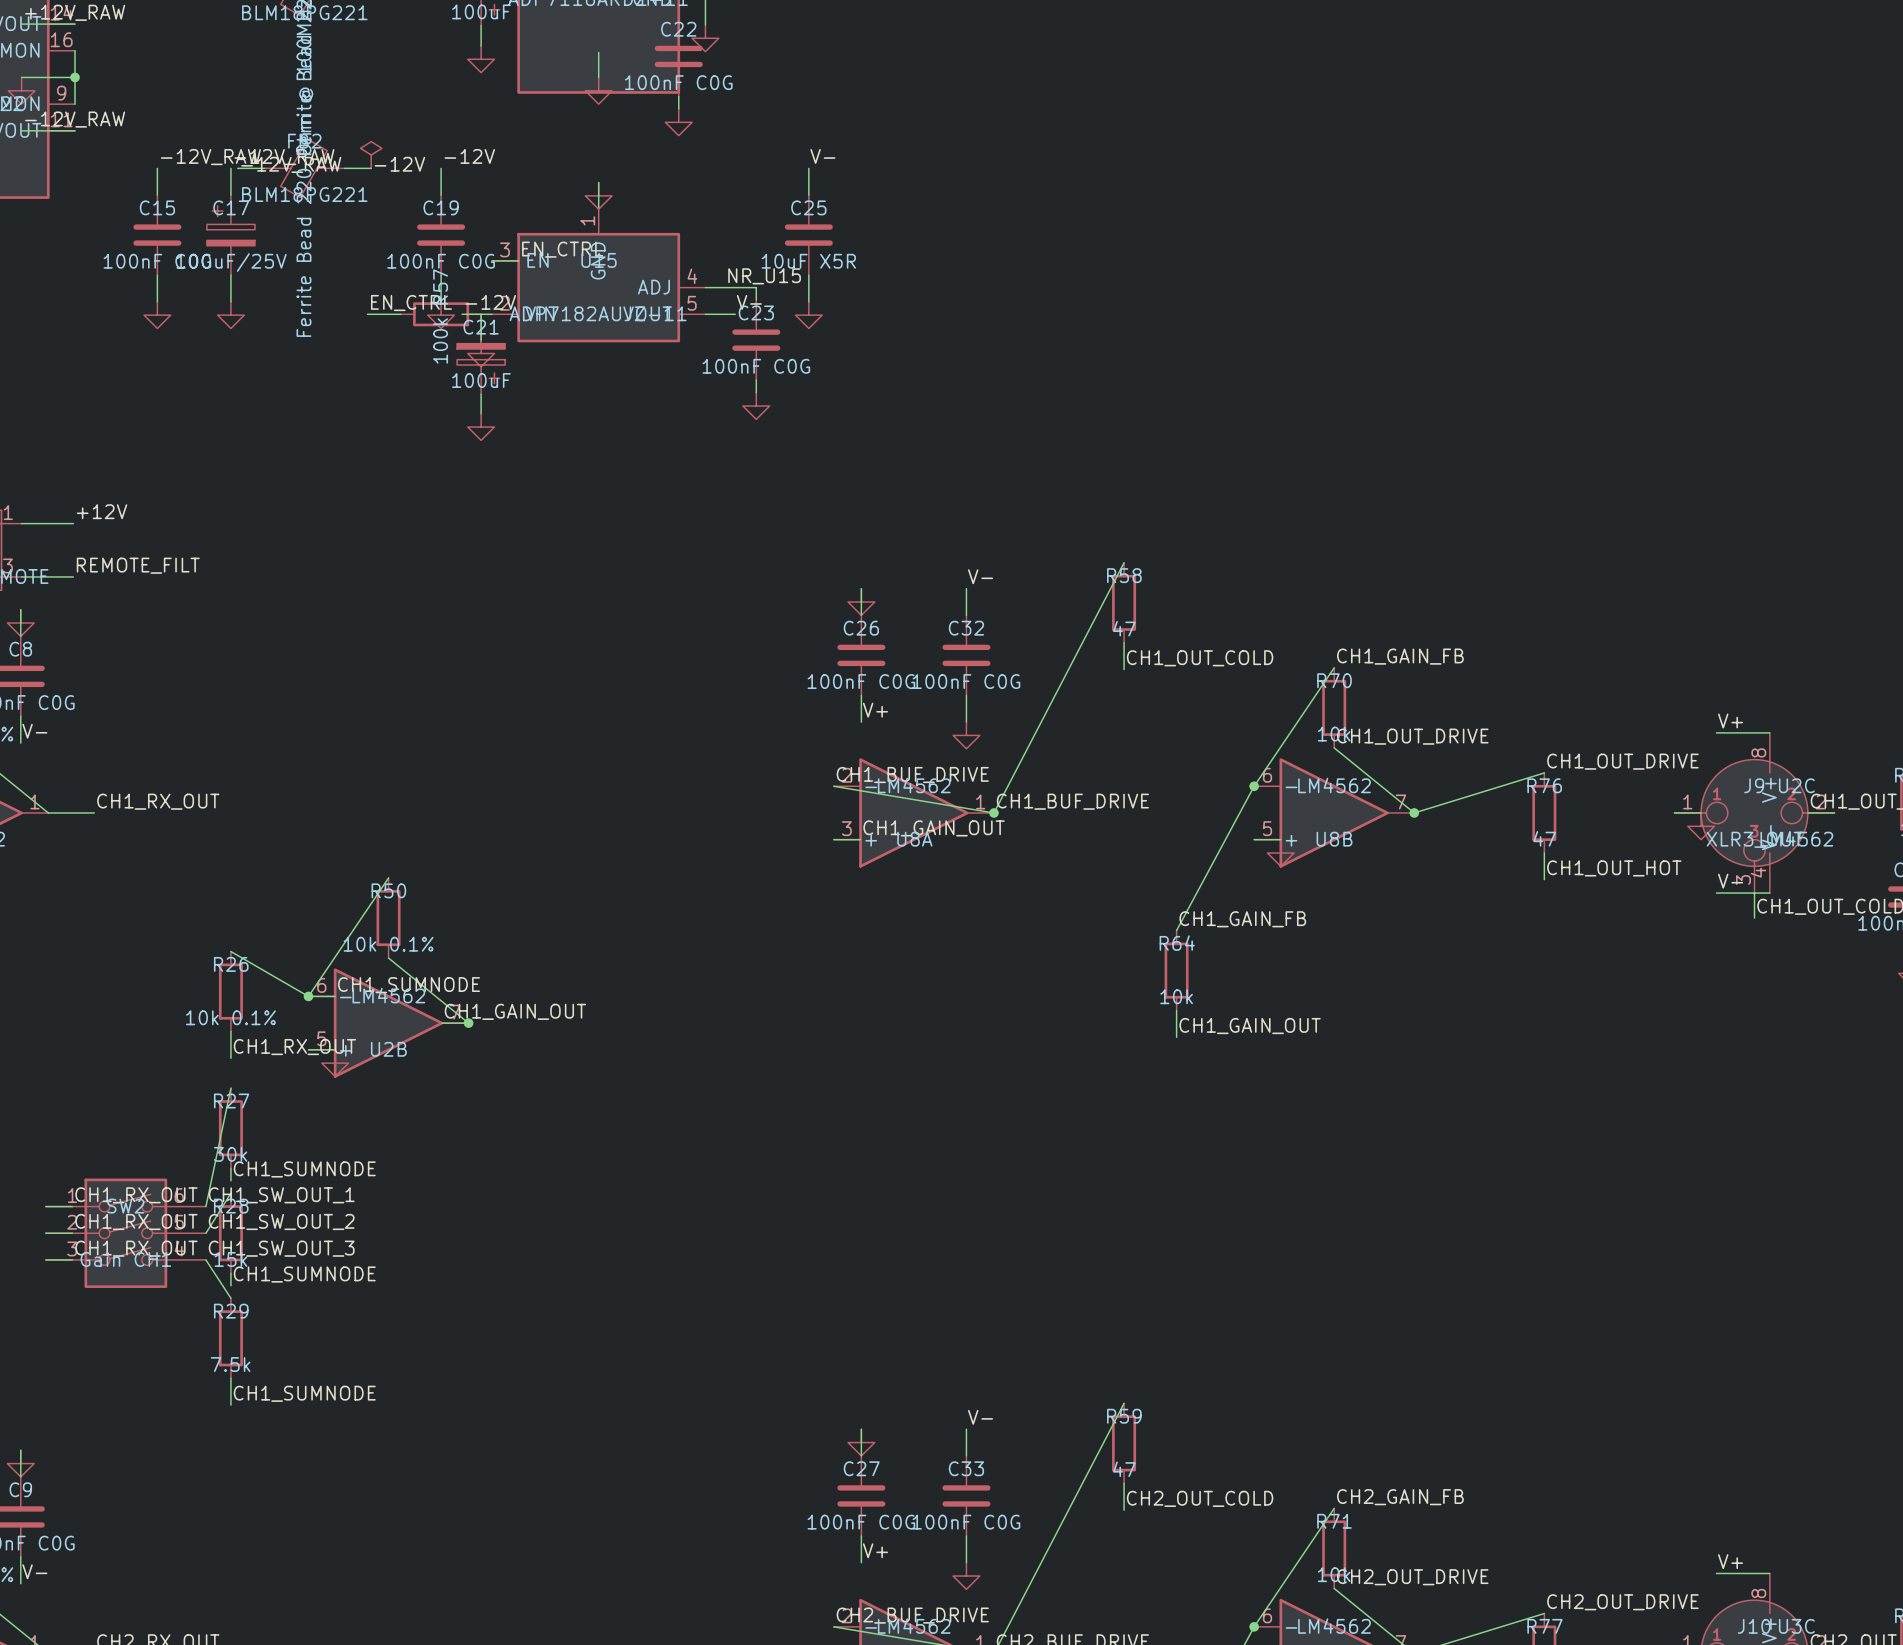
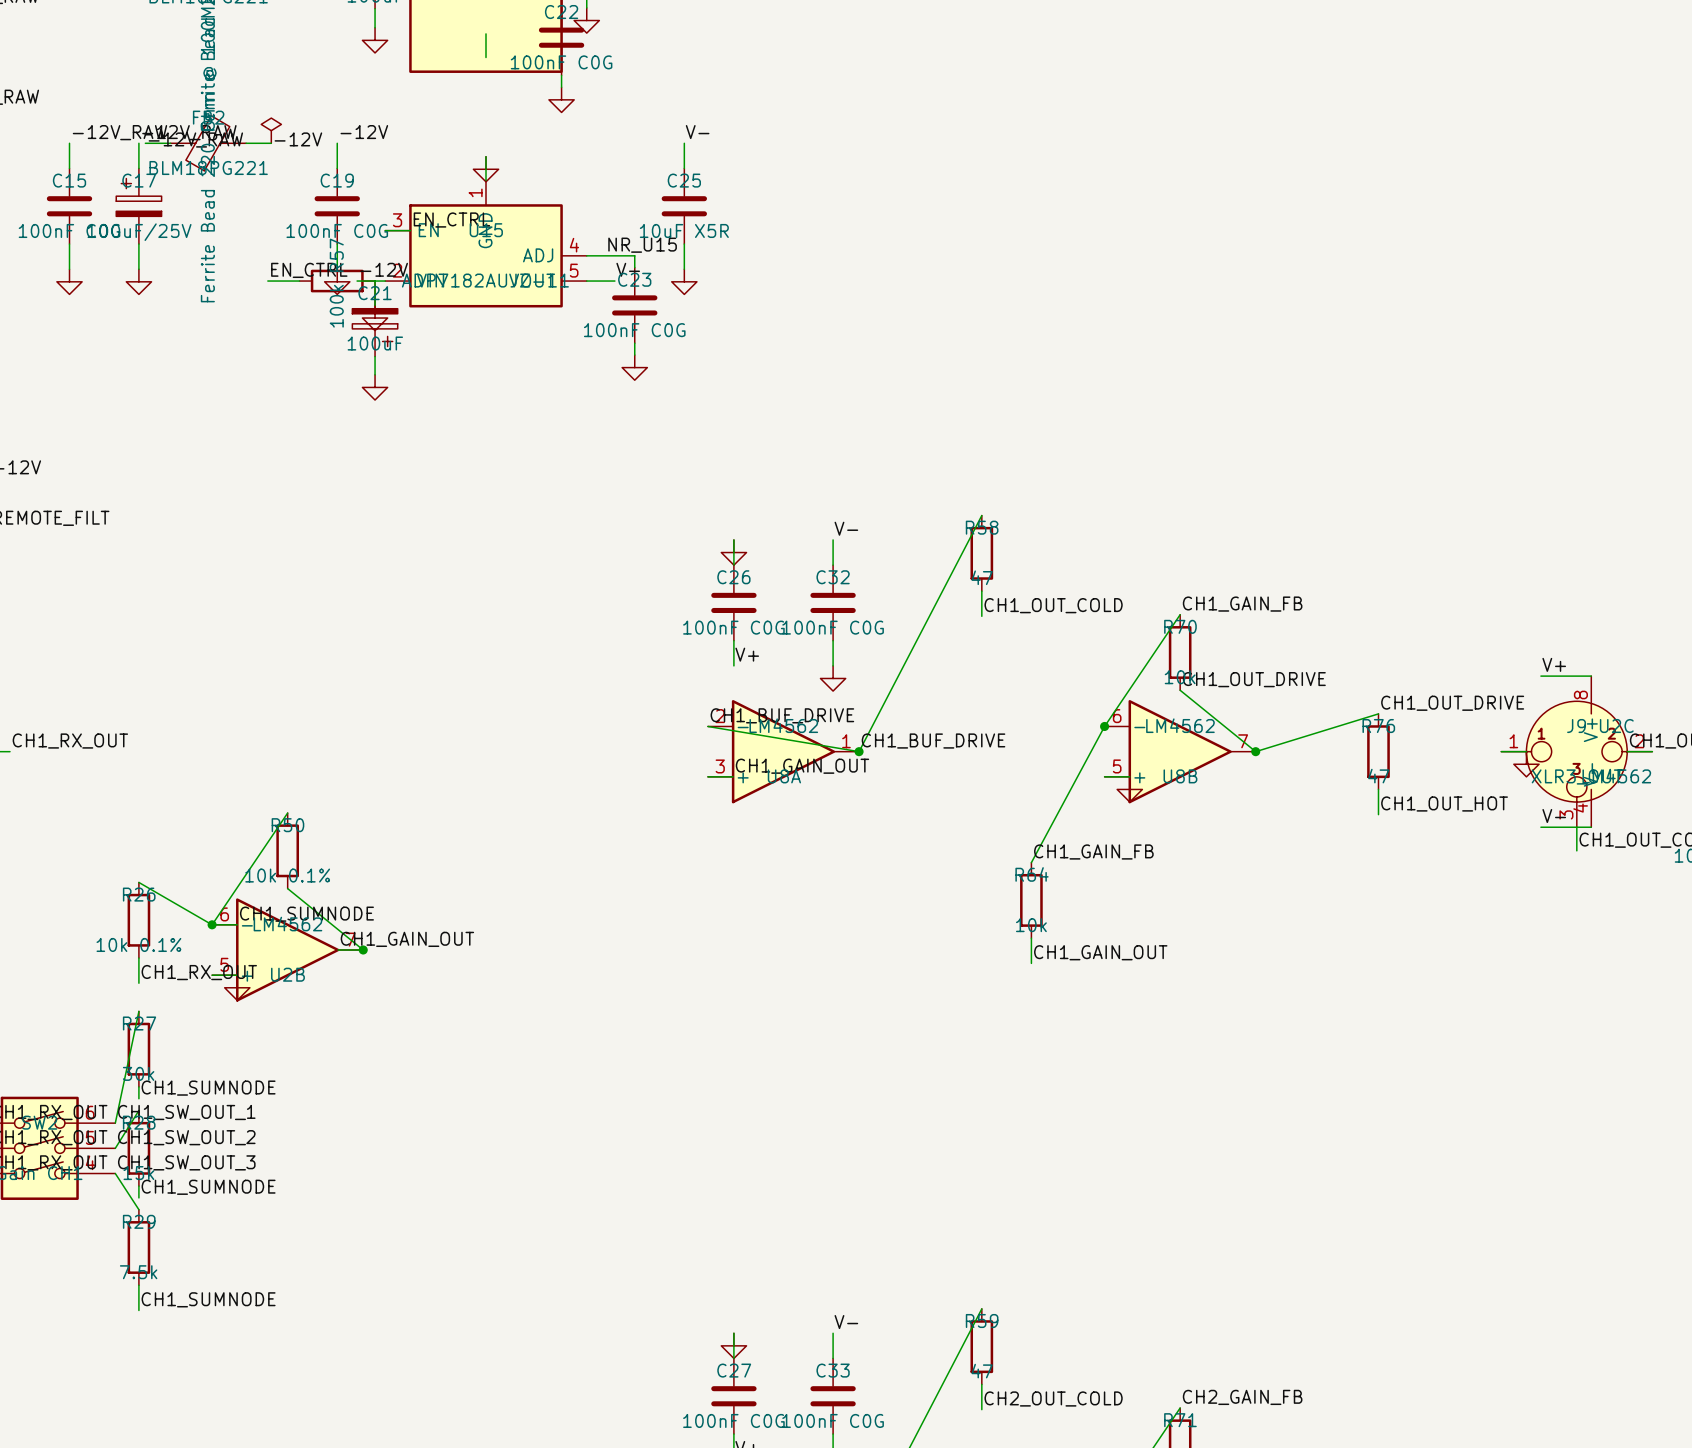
power symbol: (598, 90) -> none

